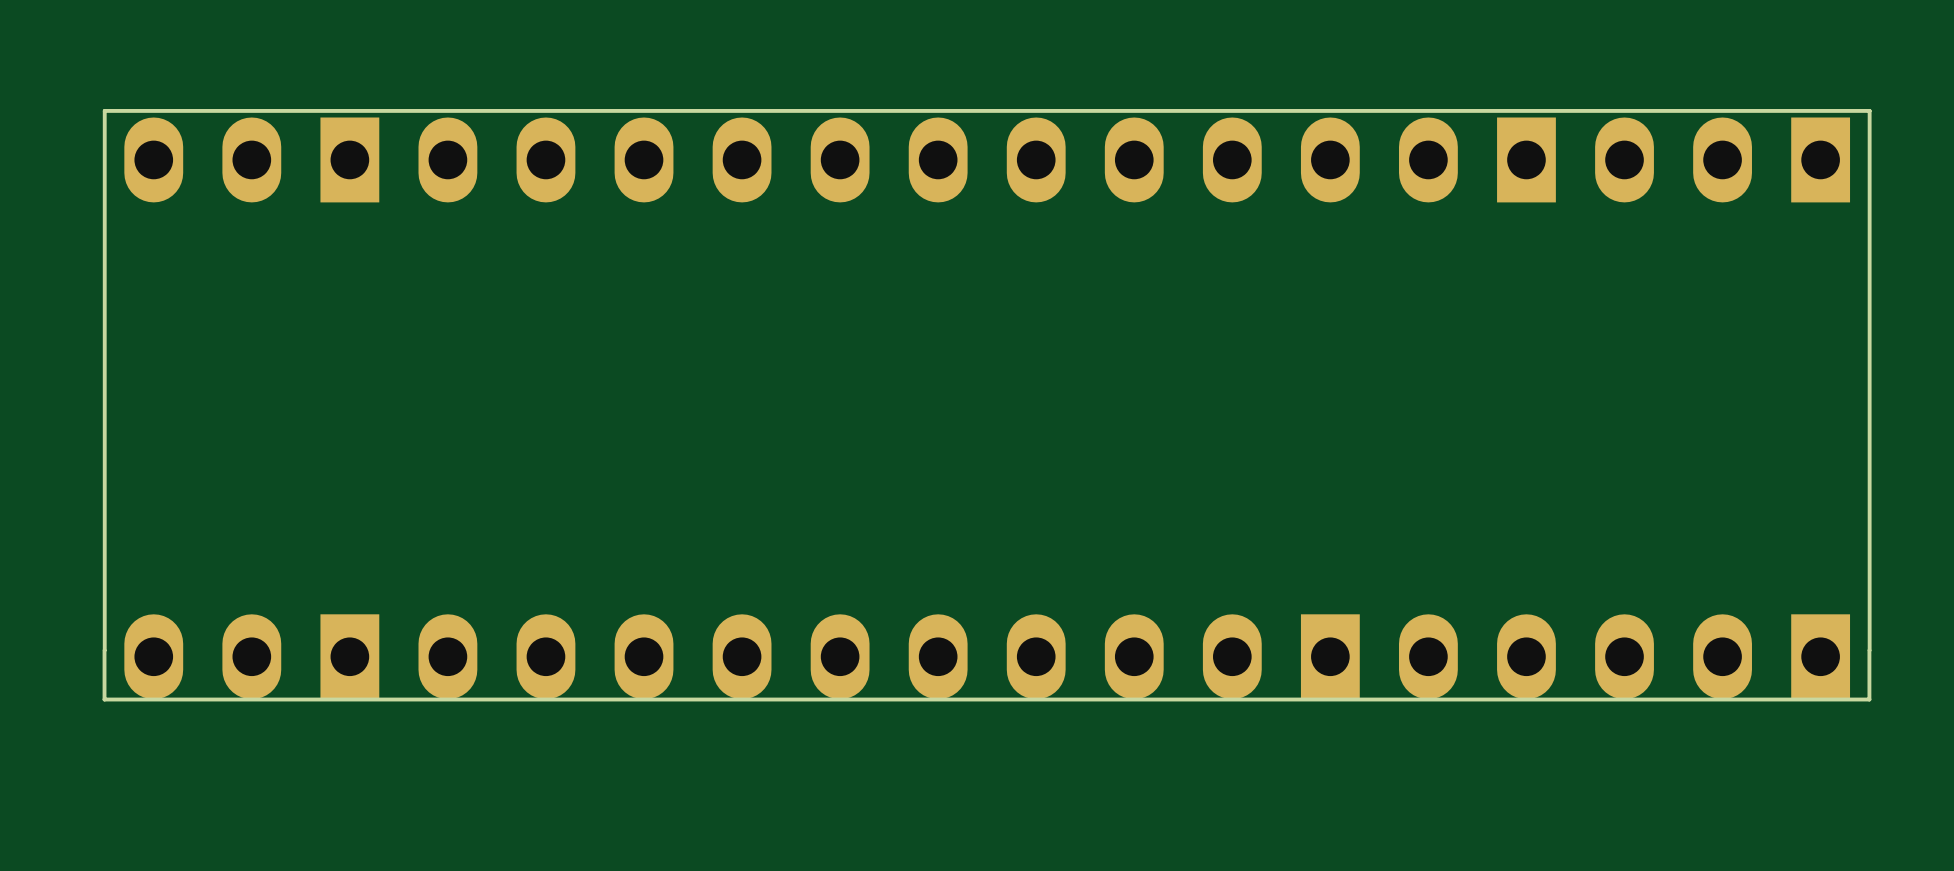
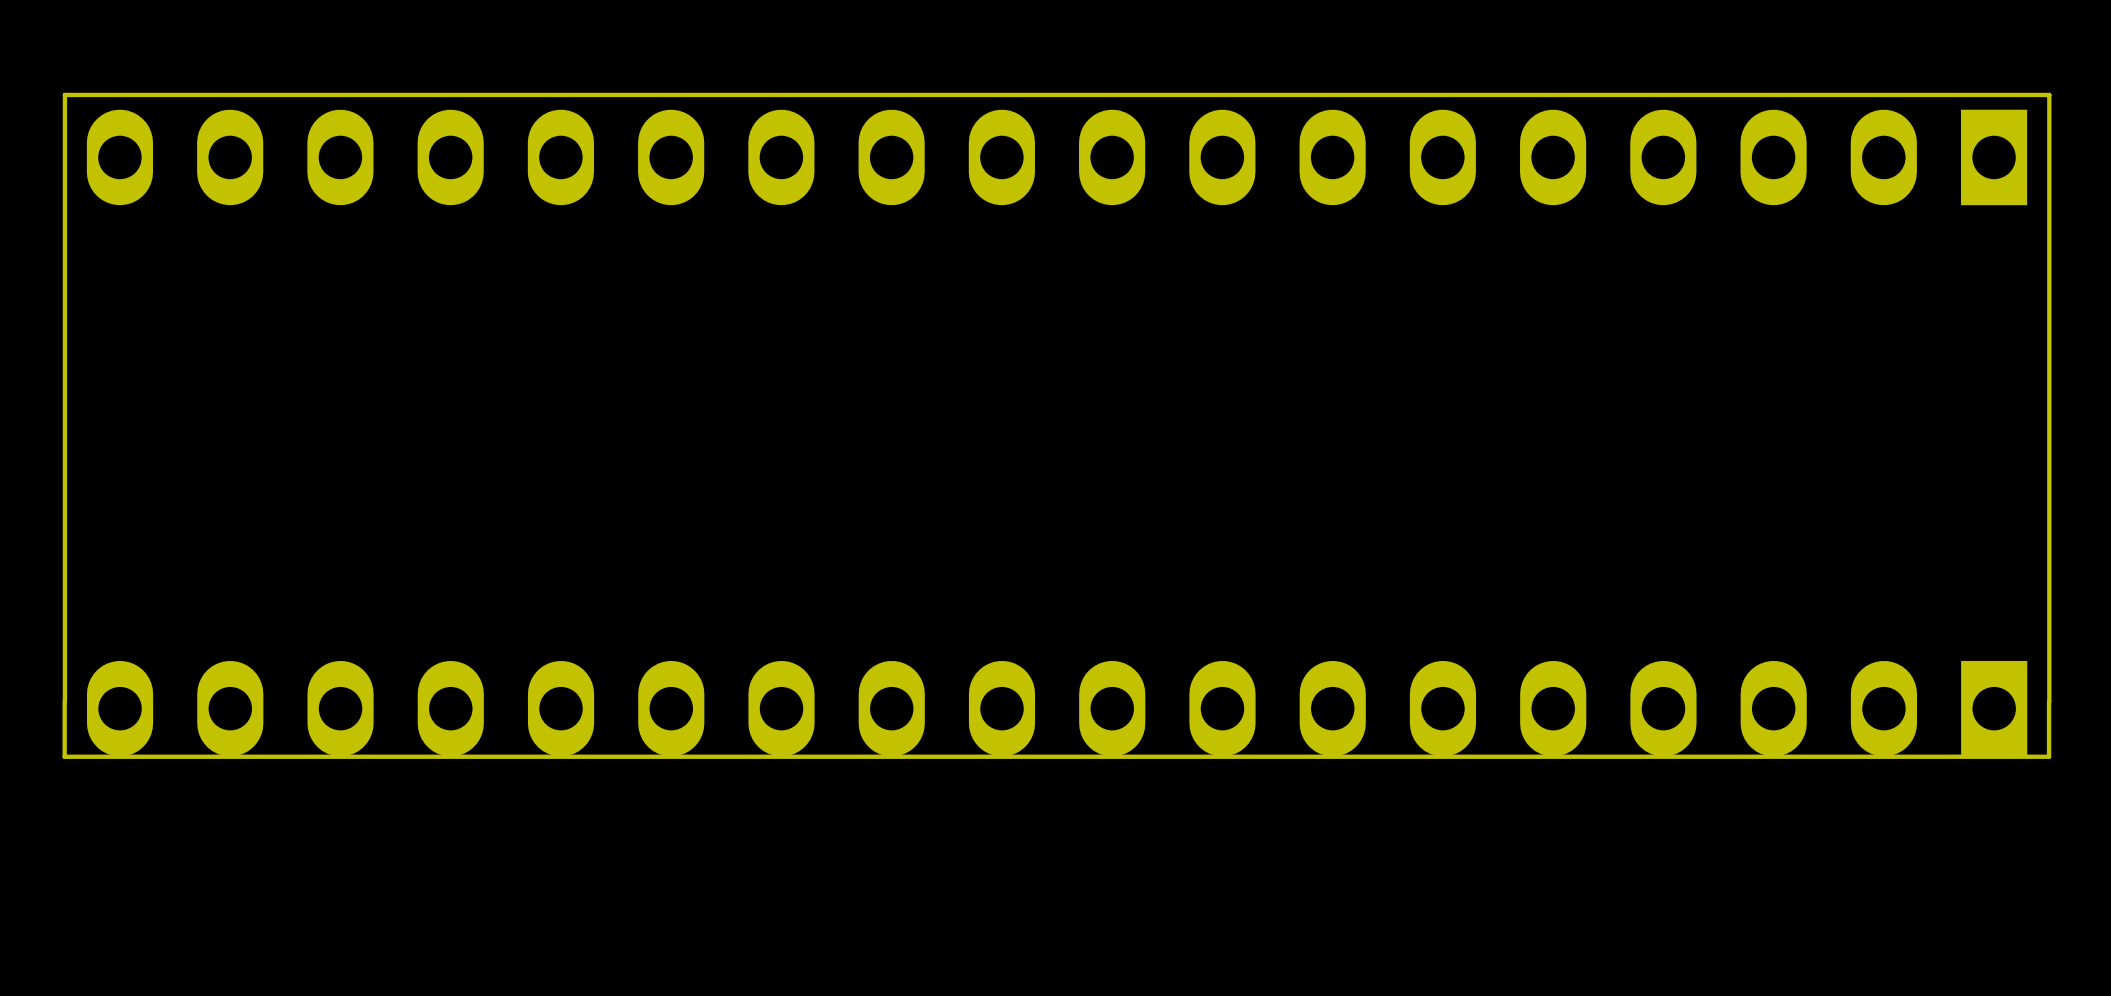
part footprint: [418, 117, 1556, 203] -> [86, 109, 2028, 206]
part: (251, 159) -> none
part: (1722, 159) -> none
part: (251, 656) -> none
part: (889, 656) -> none
part: none -> (1057, 708)

